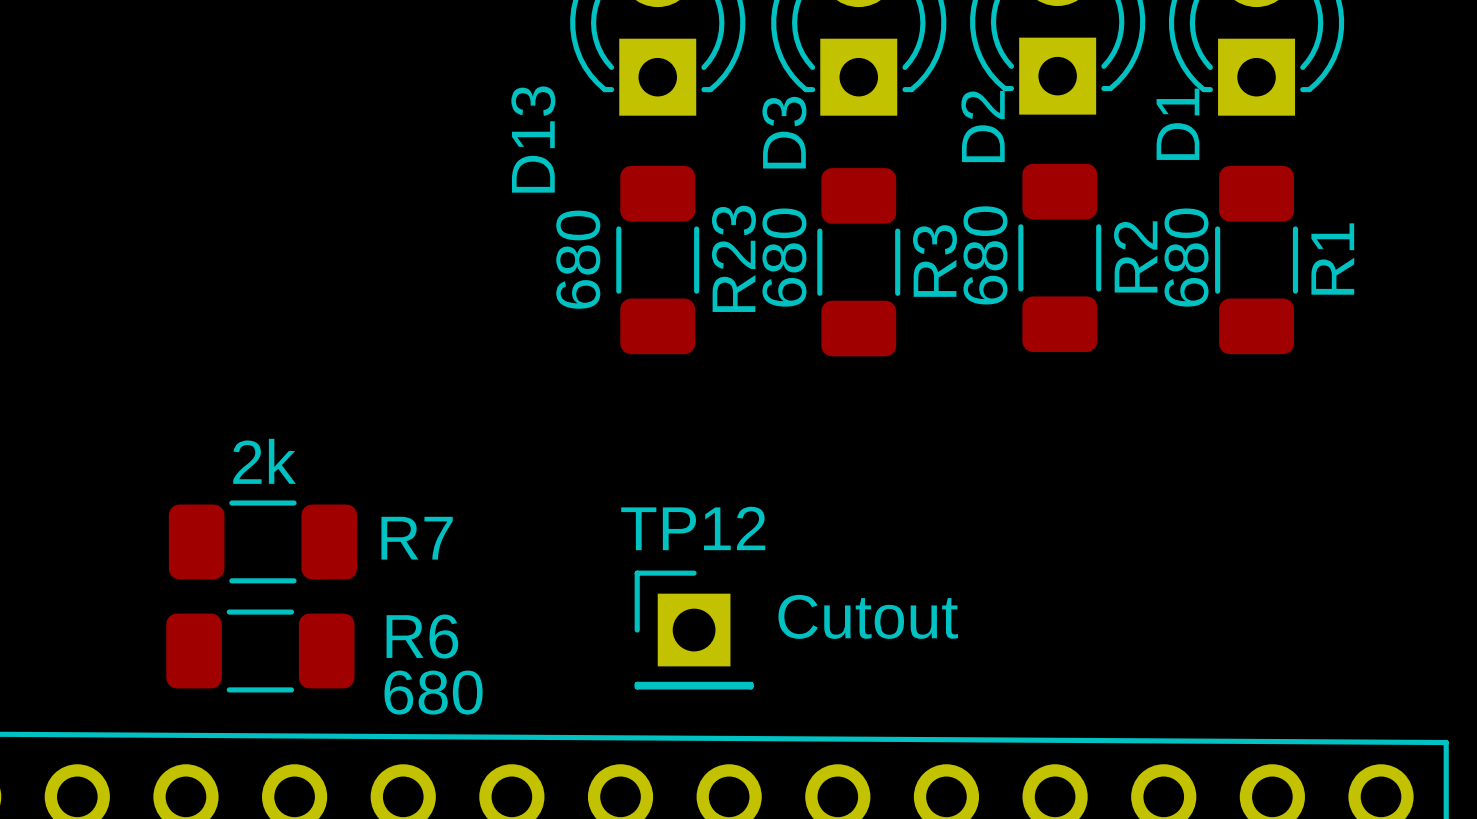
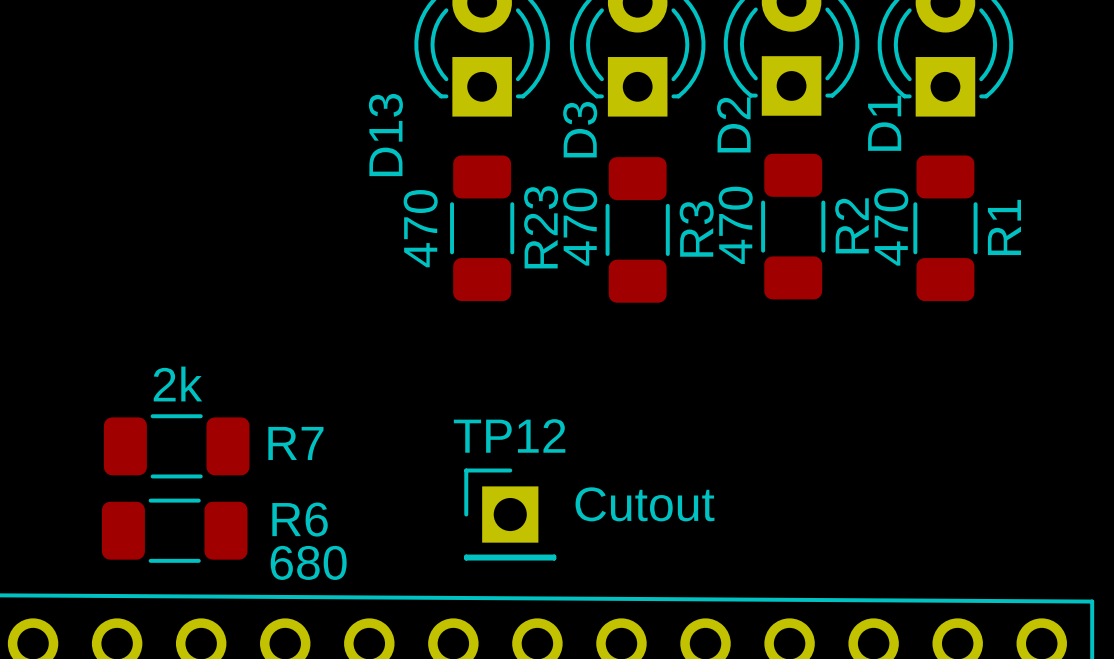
R2 value: 680 (985, 255) -> 470 (735, 225)
R3 value: 680 (784, 257) -> 470 (580, 227)
R1 value: 680 (1186, 257) -> 470 (891, 227)
R23 value: 680 (578, 259) -> 470 (420, 228)

